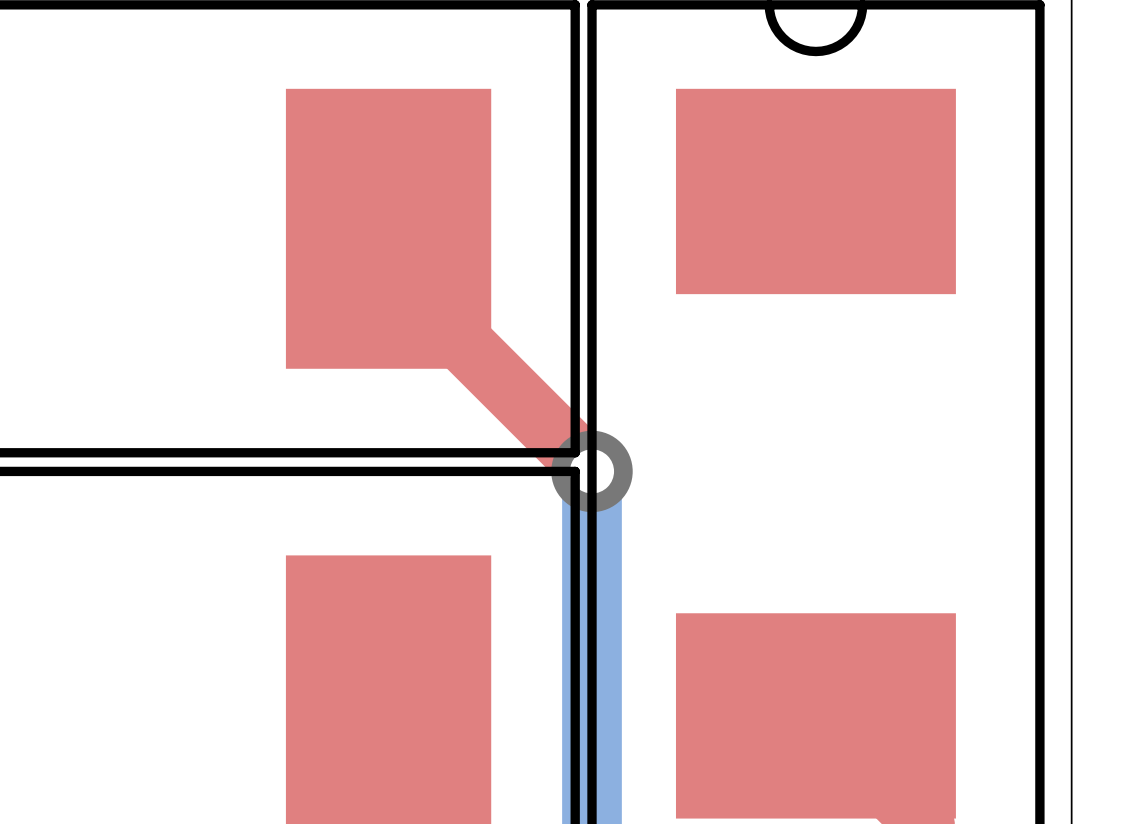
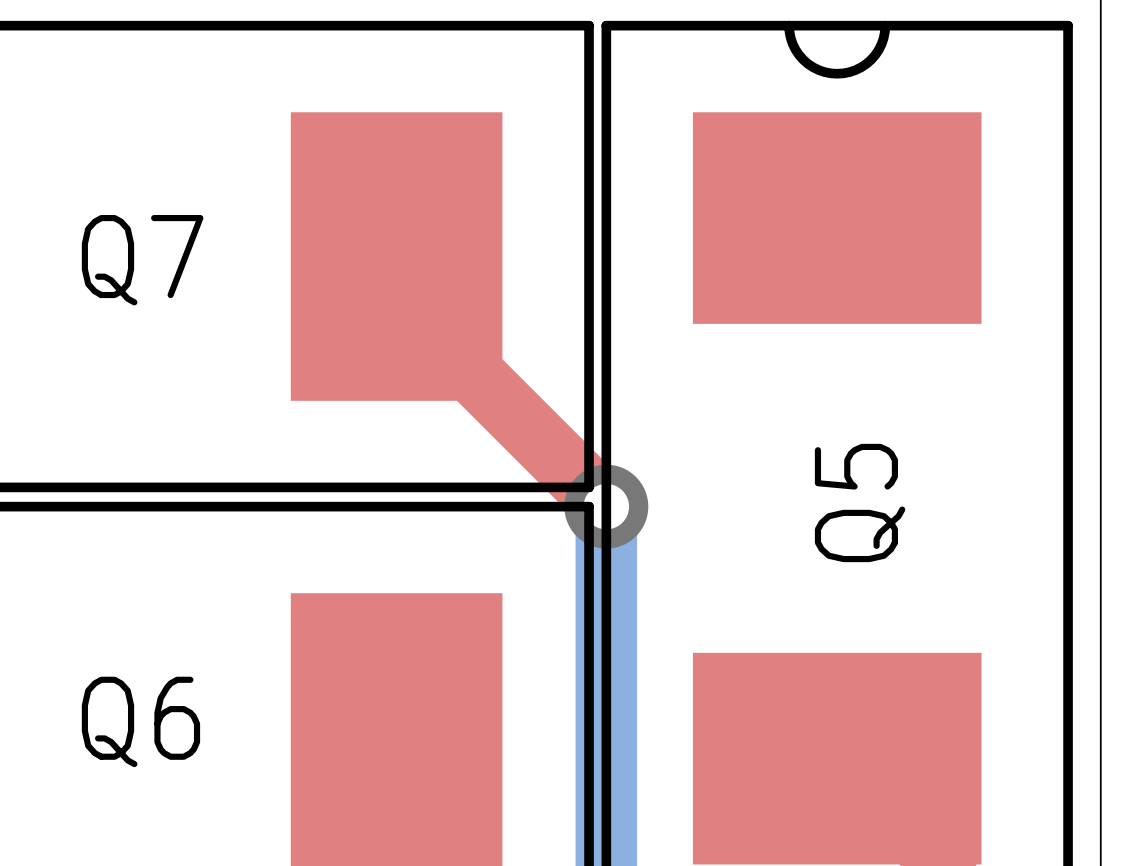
Q7 name: none -> Q7 (142, 260)
Q5 name: none -> Q5 (860, 502)
Q6 name: none -> Q6 (140, 721)

